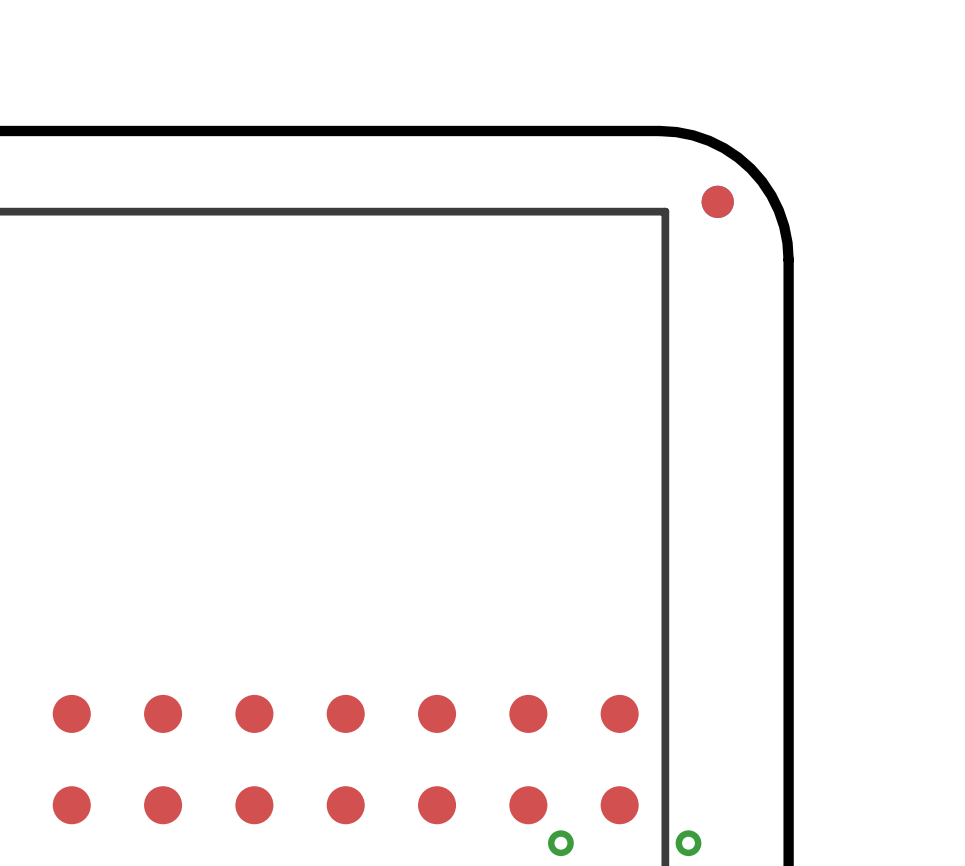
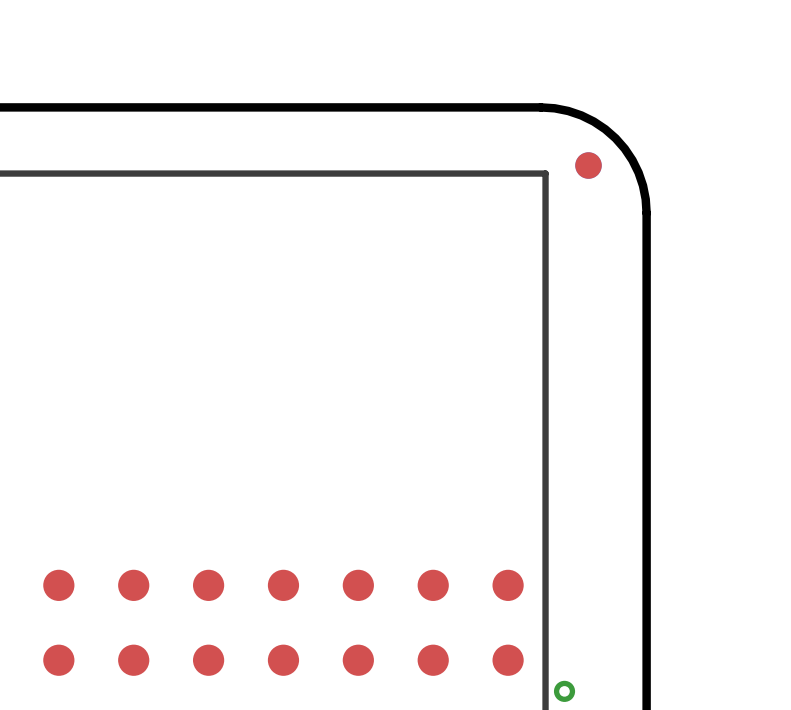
via: (560, 843) -> none

